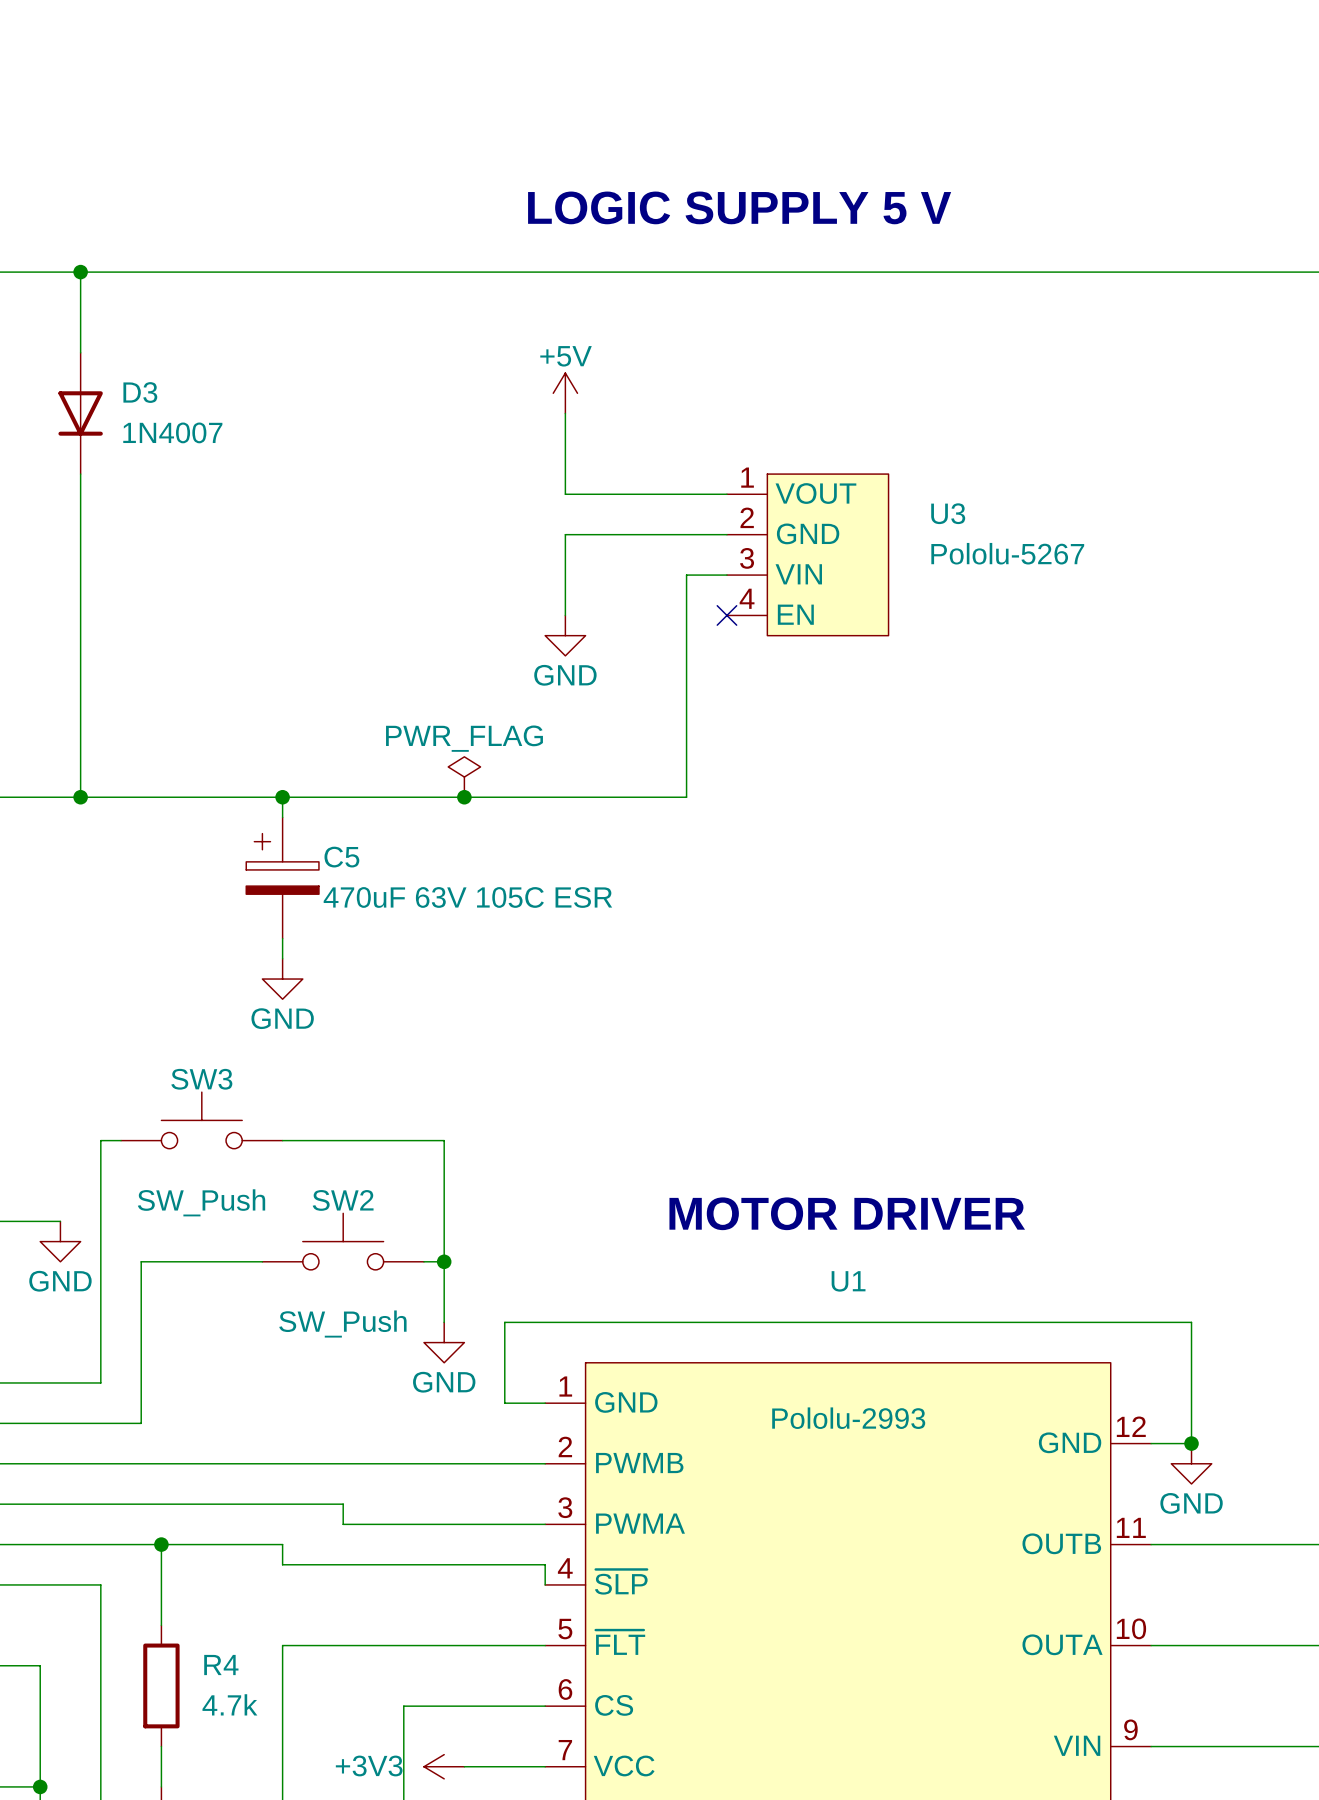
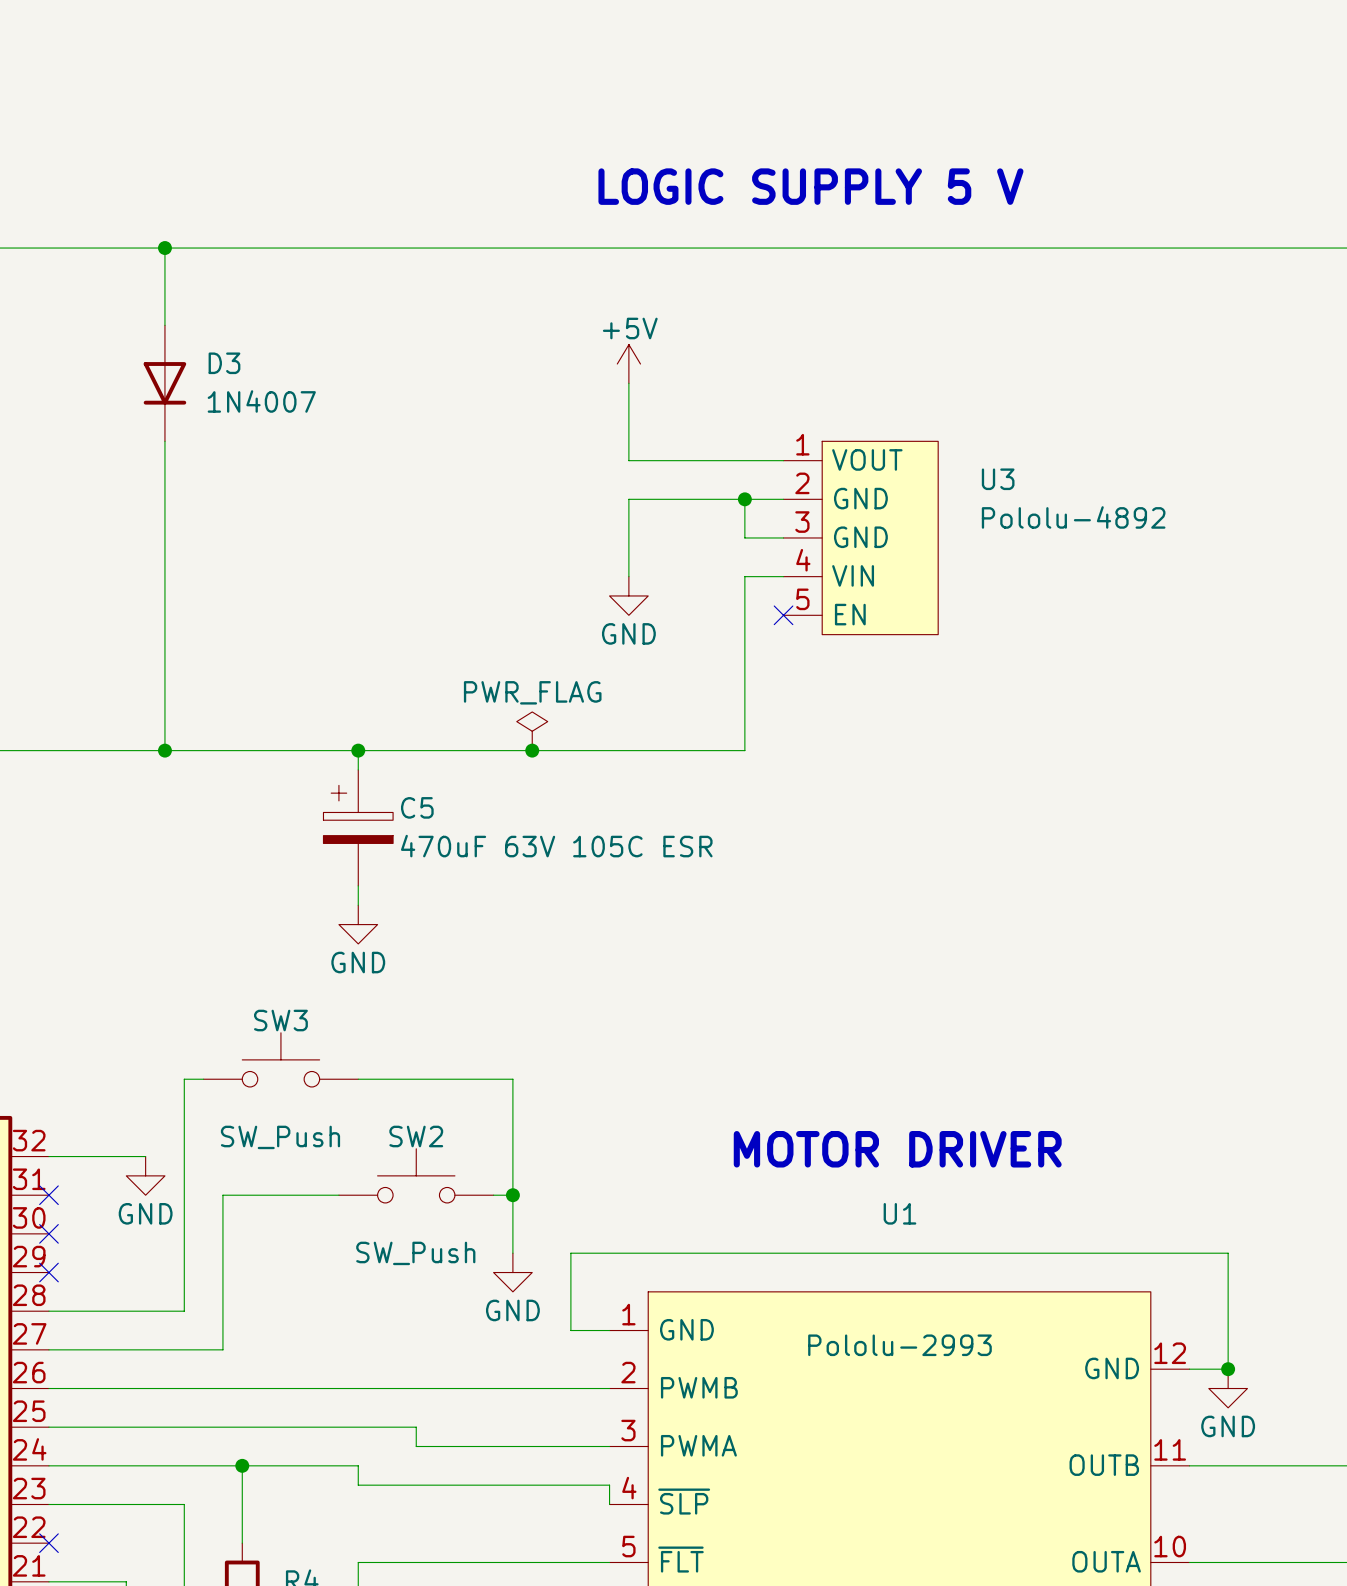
U3 symbol: [726, 474, 889, 636] -> [783, 441, 939, 635]
wire: none -> (744, 499) (744, 537)
junction: none -> (744, 499)
U3 value: Pololu-5267 (1007, 553) -> Pololu-4892 (1073, 517)
wire: (686, 575) (686, 615) -> (783, 576) (744, 576)
no-connect mark position: (726, 615) -> (783, 615)

